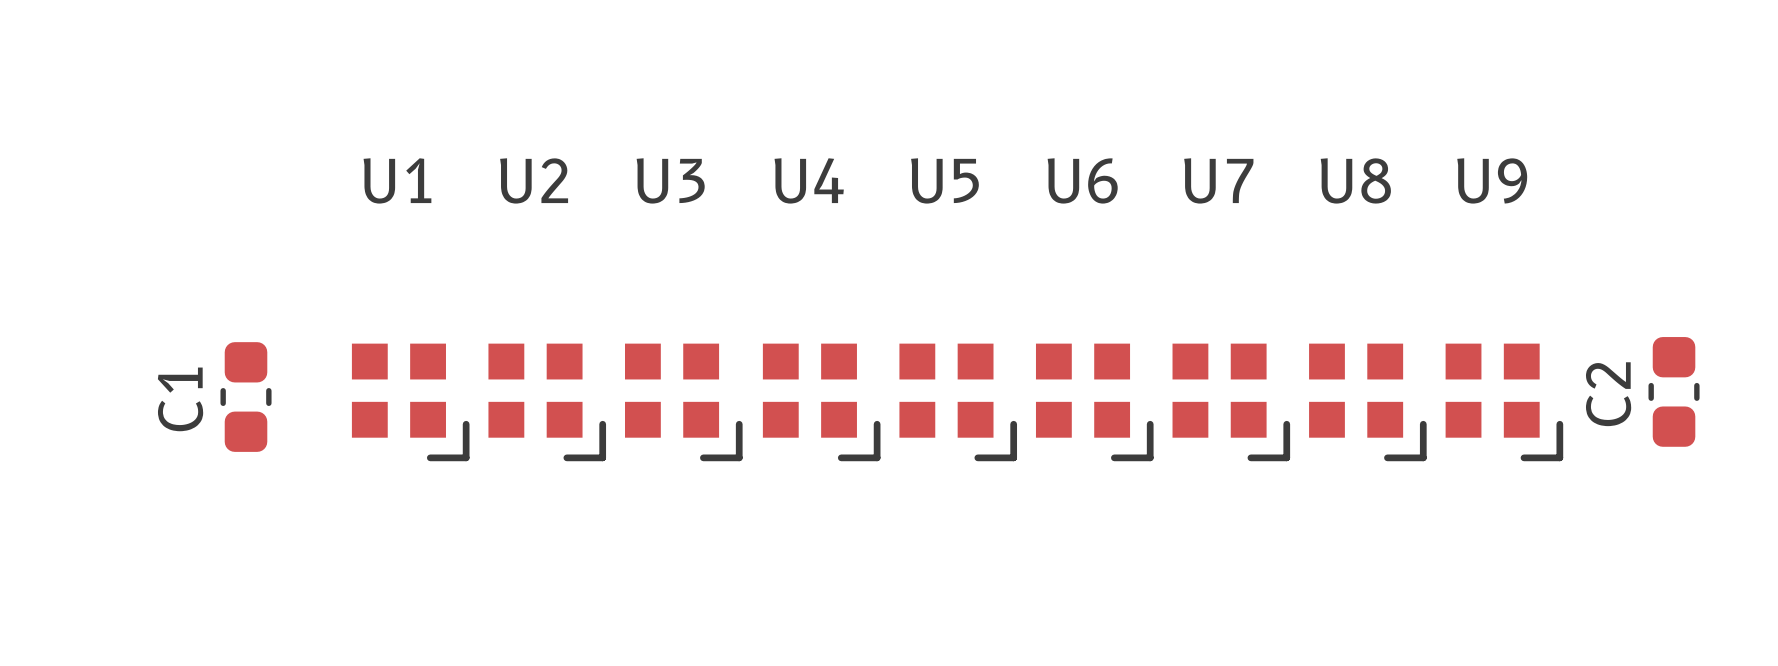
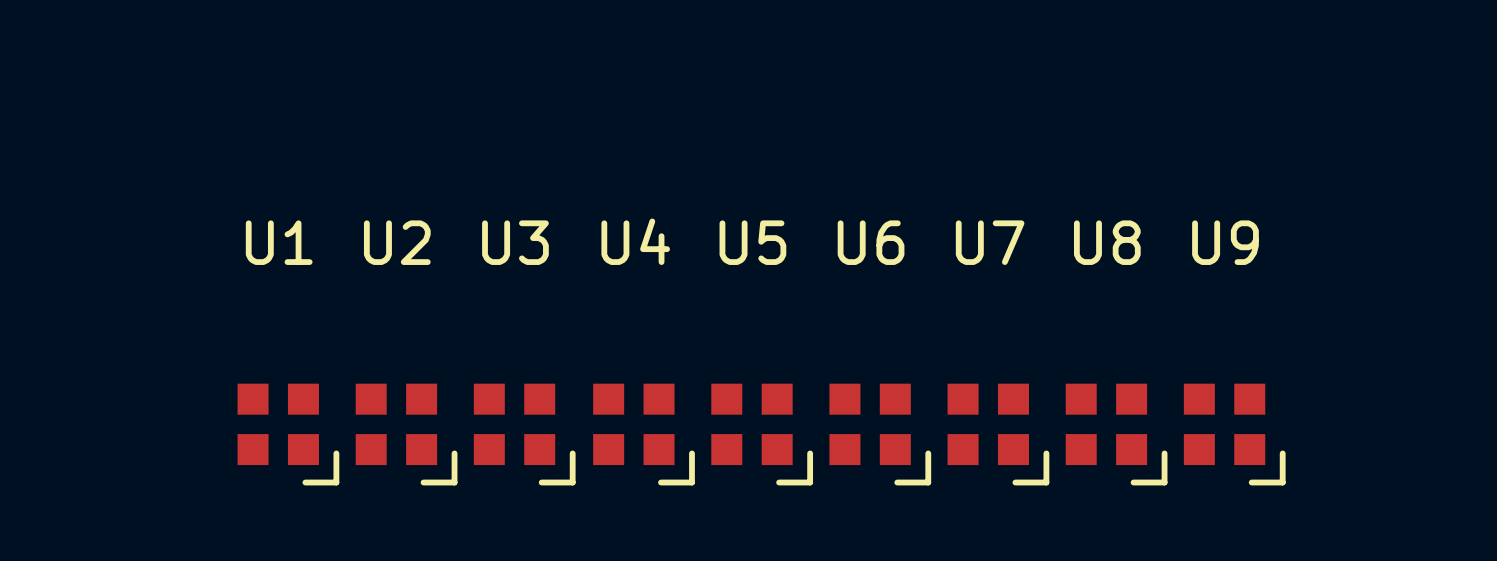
C2: (1674, 391) -> none
C1: (246, 397) -> none

